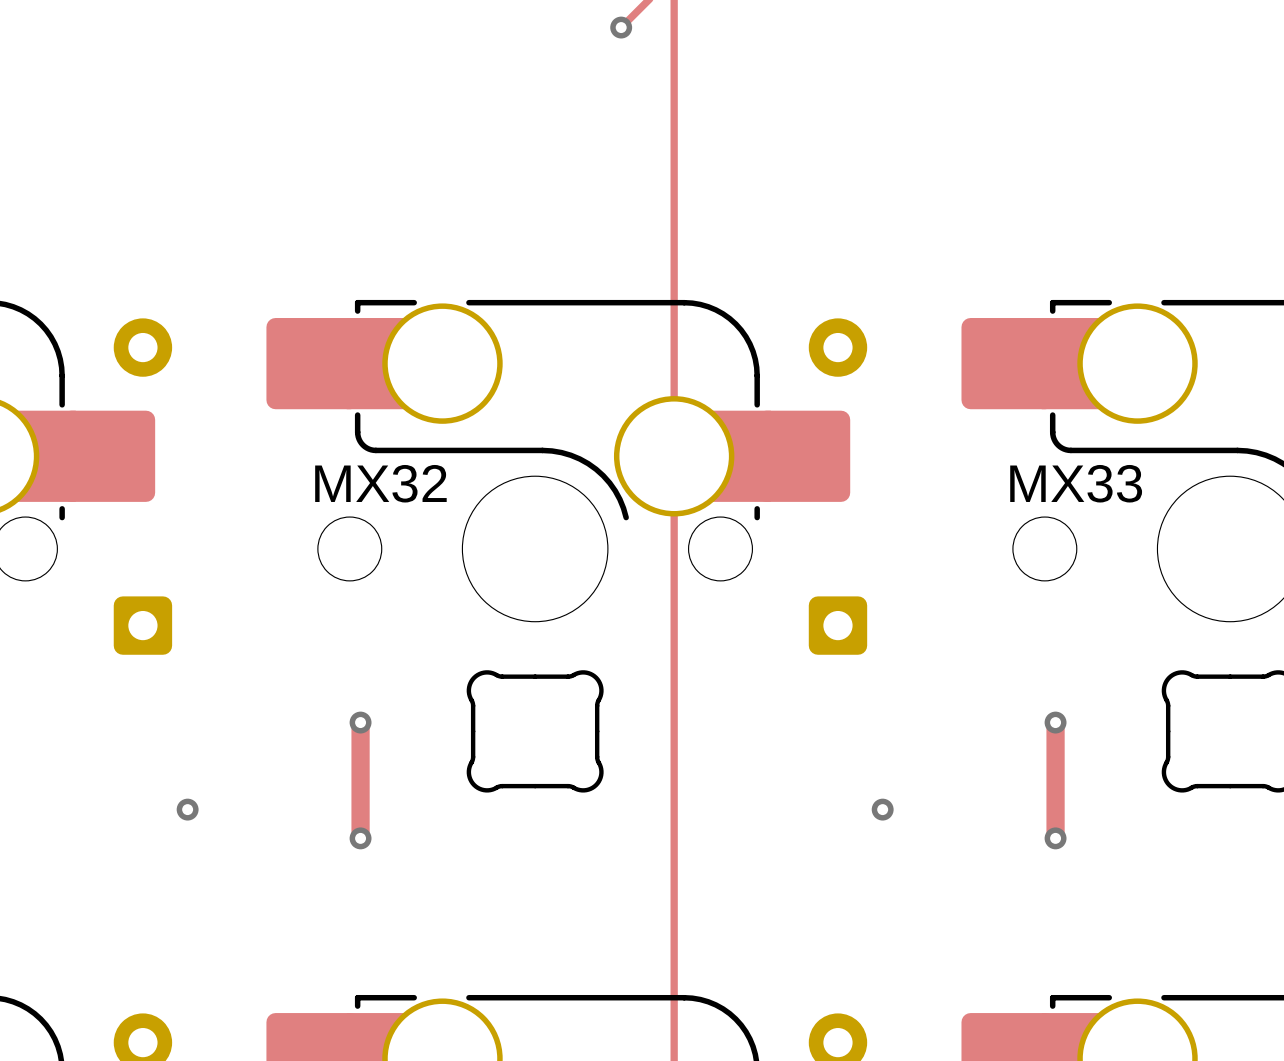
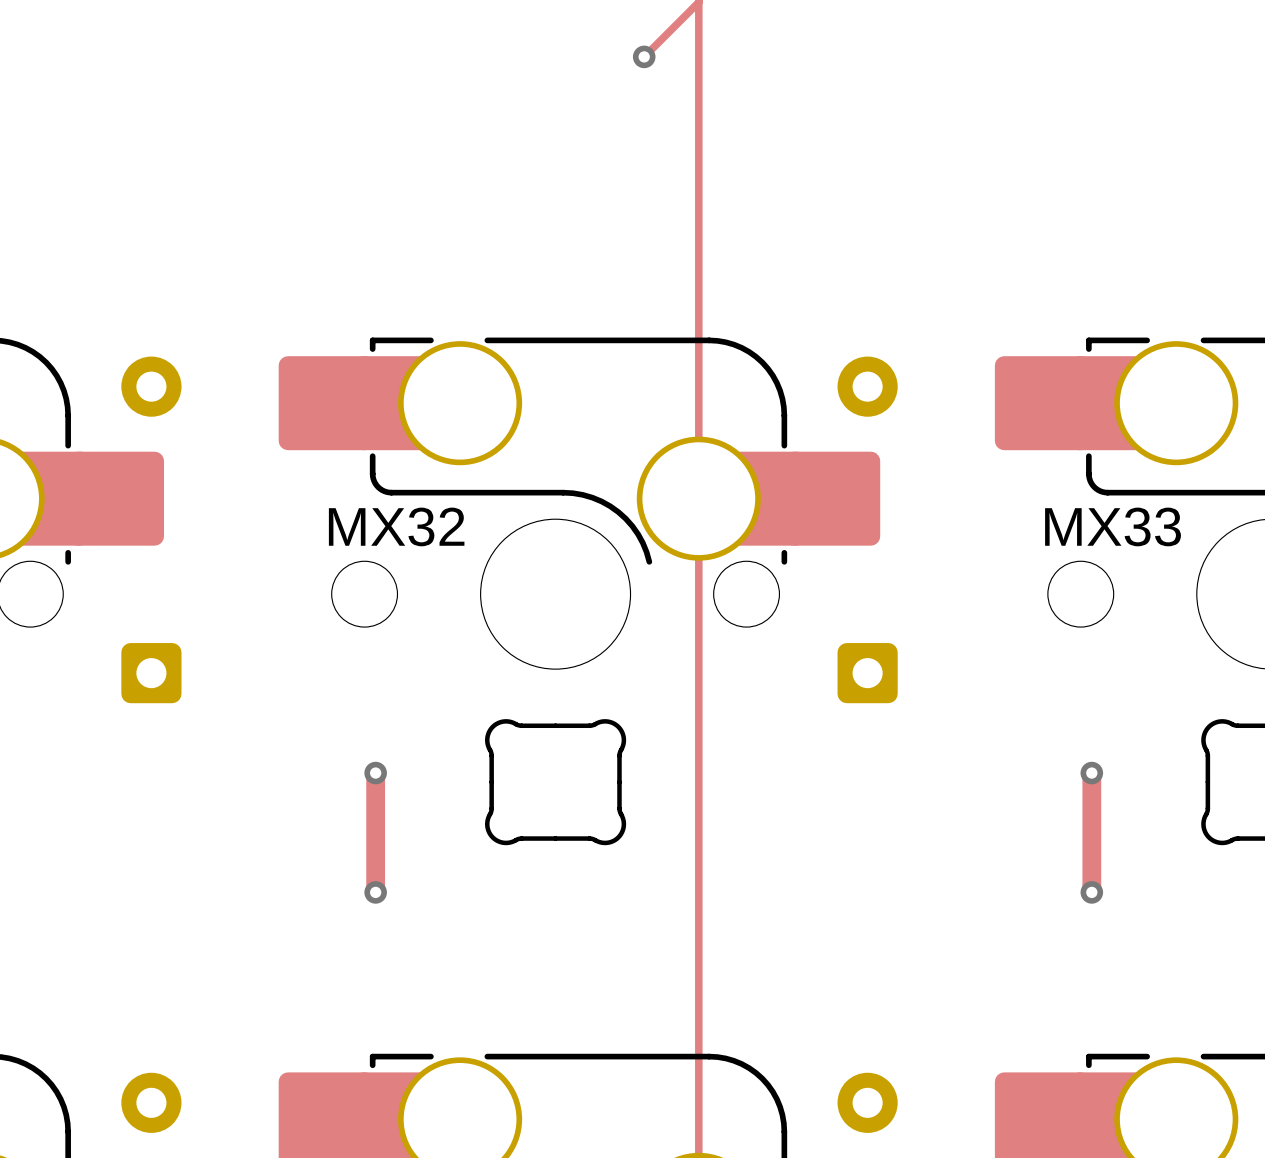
via: (187, 809) -> none
via: (882, 809) -> none

